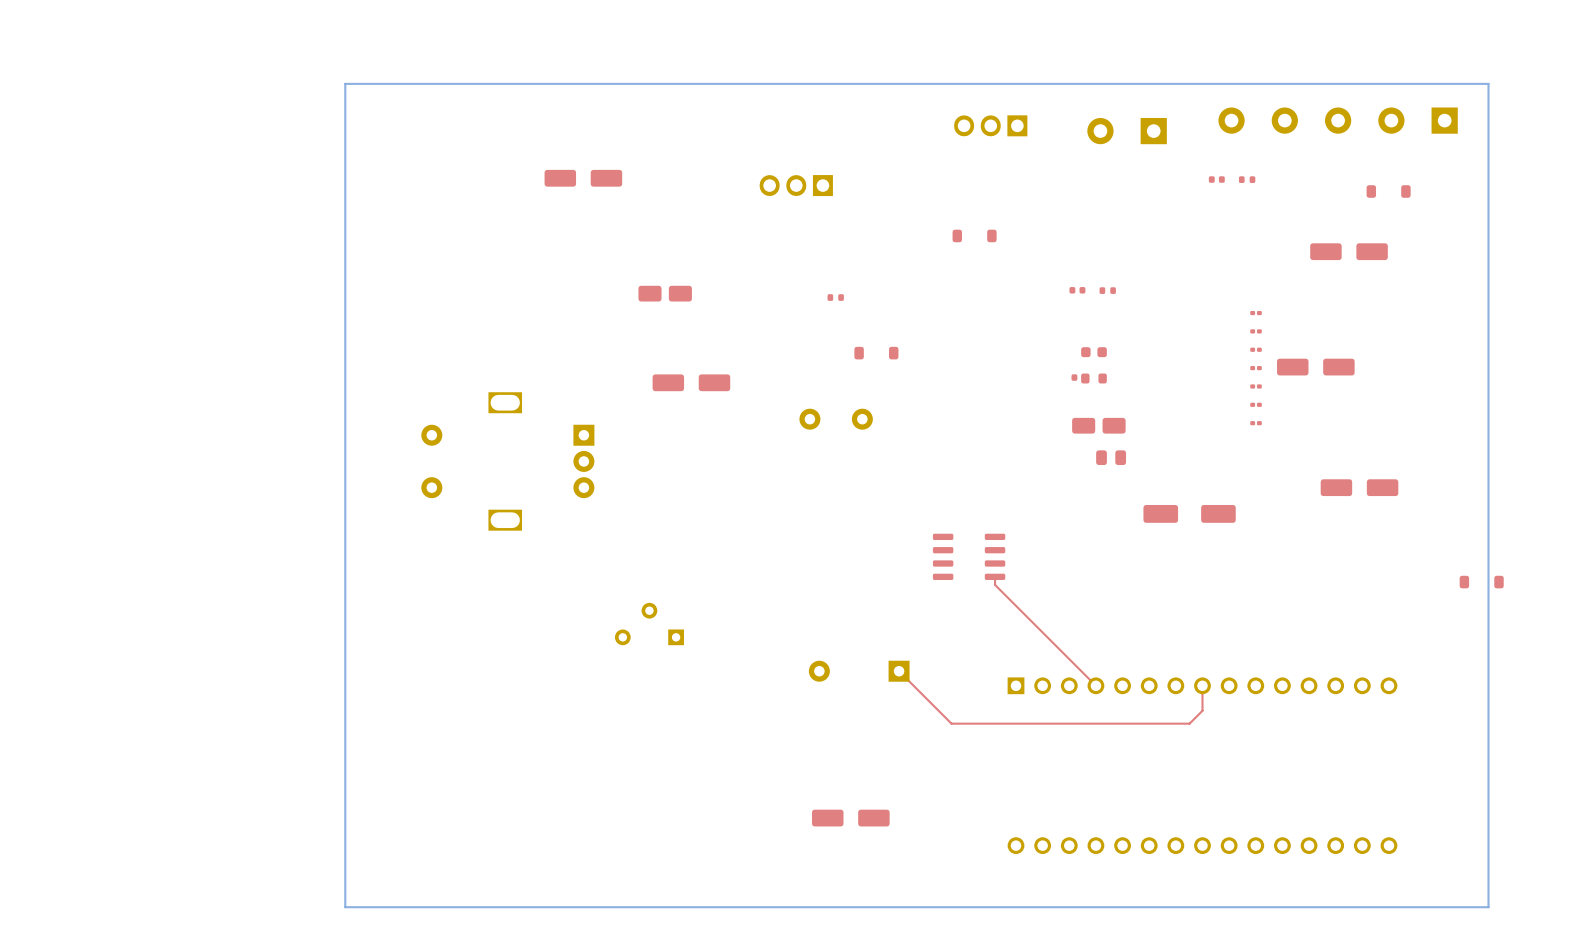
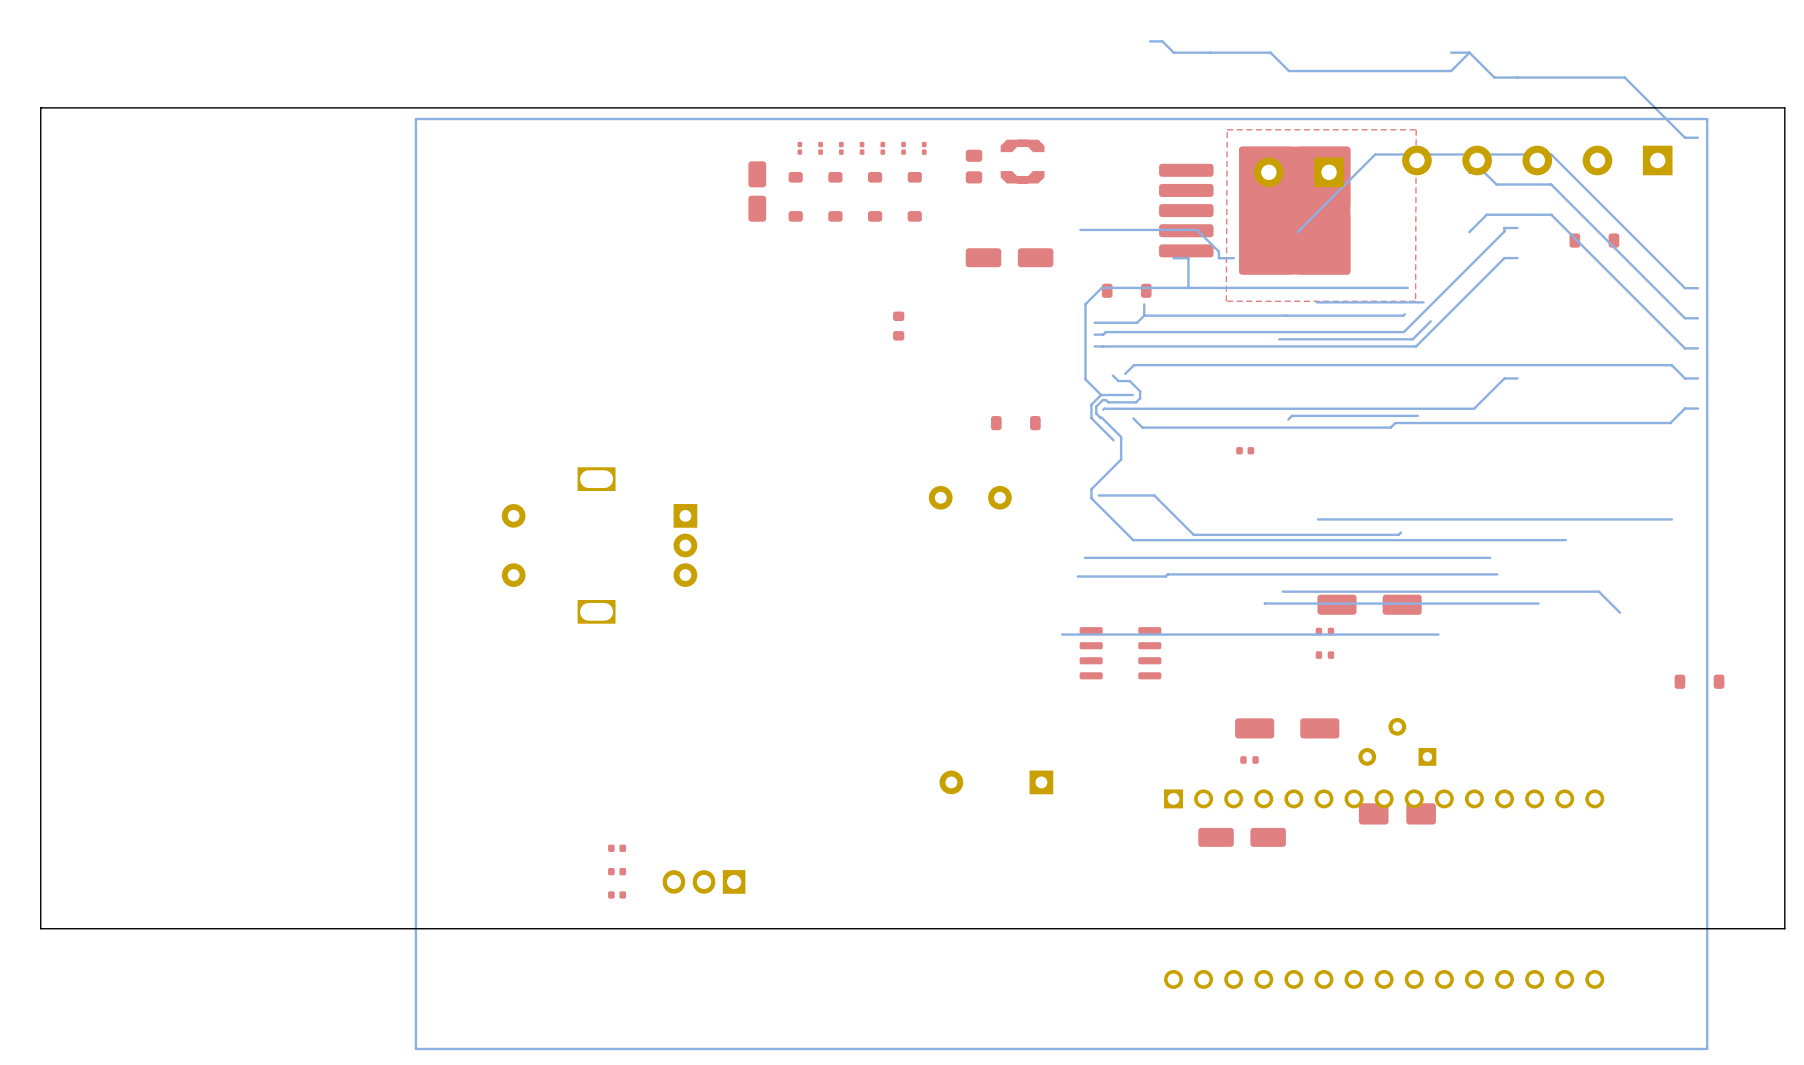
bottom track: none -> (1149, 41) (1162, 41) (1173, 52) (1270, 52) (1288, 71) (1451, 71) (1469, 52)
bottom track: none -> (1469, 52) (1494, 77) (1624, 77) (1684, 137) (1698, 137)
bottom track: none -> (1469, 52) (1451, 52)
board edge: none -> (1784, 107) (40, 107) (40, 928) (1784, 928) (1784, 107)
top zone outline: none -> (1416, 129) (1415, 301) (1226, 301) (1227, 129) (1416, 129)
part: none -> (799, 148)
part: none -> (820, 148)
part: none -> (841, 148)
part: none -> (862, 148)
part: none -> (882, 148)
part: none -> (903, 148)
part: none -> (924, 148)
part: none -> (1022, 161)
part: none -> (974, 166)
part: (990, 125) -> none
bottom track: none -> (1469, 172) (1484, 172) (1496, 184) (1551, 184) (1684, 318) (1698, 318)
part: none -> (795, 196)
part: none -> (835, 196)
part: none -> (875, 196)
part: none -> (914, 196)
part: none -> (1254, 210)
part: (583, 178) -> none
part: (1216, 179) -> none
part: (1247, 179) -> none
bottom track: none -> (1517, 228) (1504, 228) (1504, 231) (1403, 332) (1105, 332) (1103, 334) (1094, 334)
bottom track: none -> (1080, 229) (1197, 229) (1218, 251) (1218, 258) (1233, 258)
bottom track: none -> (1297, 232) (1375, 154) (1551, 154) (1684, 288) (1698, 288)
bottom track: none -> (1469, 232) (1486, 214) (1551, 214) (1684, 348) (1698, 348)
part: (796, 185) -> none
part: none -> (1009, 257)
bottom track: none -> (1173, 258) (1188, 258) (1188, 287)
bottom track: none -> (1517, 258) (1504, 258) (1416, 346) (1094, 346)
bottom track: none -> (1407, 287) (1101, 287) (1085, 304) (1085, 379) (1101, 395)
bottom track: none -> (1423, 302) (1316, 302)
bottom track: none -> (1144, 304) (1144, 315)
part: (1349, 251) -> none
bottom track: none -> (1404, 314) (1144, 315)
bottom track: none -> (1144, 315) (1137, 322) (1094, 322)
bottom track: none -> (1430, 321) (1412, 339) (1279, 339)
part: none -> (898, 326)
part: (1077, 290) -> none
part: (1107, 290) -> none
part rotation: 0° (665, 293) -> 90° clockwise (757, 191)
part position: (665, 293) -> (757, 191)
part: (835, 297) -> none
bottom track: none -> (1125, 373) (1133, 365) (1671, 365) (1684, 378) (1698, 378)
bottom track: none -> (1112, 375) (1118, 381) (1129, 381) (1140, 391) (1140, 398) (1136, 402) (1108, 402) (1102, 400) (1096, 406) (1096, 413) (1121, 437) (1121, 459) (1091, 489) (1091, 498) (1133, 540) (1565, 540)
part: (1256, 313) -> none
bottom track: none -> (1517, 378) (1504, 378) (1474, 408) (1103, 409)
bottom track: none -> (1101, 395) (1091, 404) (1091, 418) (1113, 440)
bottom track: none -> (1132, 395) (1101, 395)
part: (1256, 331) -> none
bottom track: none -> (1698, 408) (1684, 408) (1670, 423) (1395, 423) (1390, 427) (1142, 427) (1133, 418)
bottom track: none -> (1418, 415) (1292, 415) (1288, 419)
part: (1256, 349) -> none
part: (1093, 352) -> none
part: (1315, 367) -> none
part: (1256, 368) -> none
part: (1093, 378) -> none
part: (691, 382) -> none
part: (1256, 386) -> none
part: (1256, 404) -> none
bottom track: none -> (1098, 495) (1154, 495) (1193, 534) (1398, 534) (1401, 532)
part: (1256, 423) -> none
part: (1098, 425) -> none
bottom track: none -> (1671, 519) (1317, 519)
part: (1111, 457) -> none
bottom track: none -> (1490, 557) (1085, 557)
bottom track: none -> (1497, 574) (1167, 574) (1165, 576) (1077, 576)
part: (1359, 487) -> none
bottom track: none -> (1282, 591) (1598, 591) (1619, 612)
bottom track: none -> (1264, 603) (1538, 603)
part: none -> (1324, 631)
bottom track: none -> (1438, 634) (1062, 634)
part: none -> (1324, 655)
top track: (995, 576) (995, 584) (1095, 685) -> none
part: none -> (1287, 728)
part: (649, 624) -> none
part: none -> (1397, 741)
part: none -> (1249, 759)
top track: (899, 671) (951, 723) (1189, 723) (1202, 710) (1202, 685) -> none
part: none -> (1397, 813)
part: none -> (1242, 837)
part: none -> (617, 848)
part: none -> (617, 871)
part: none -> (704, 881)
part: none -> (617, 894)
part: (850, 818) -> none

